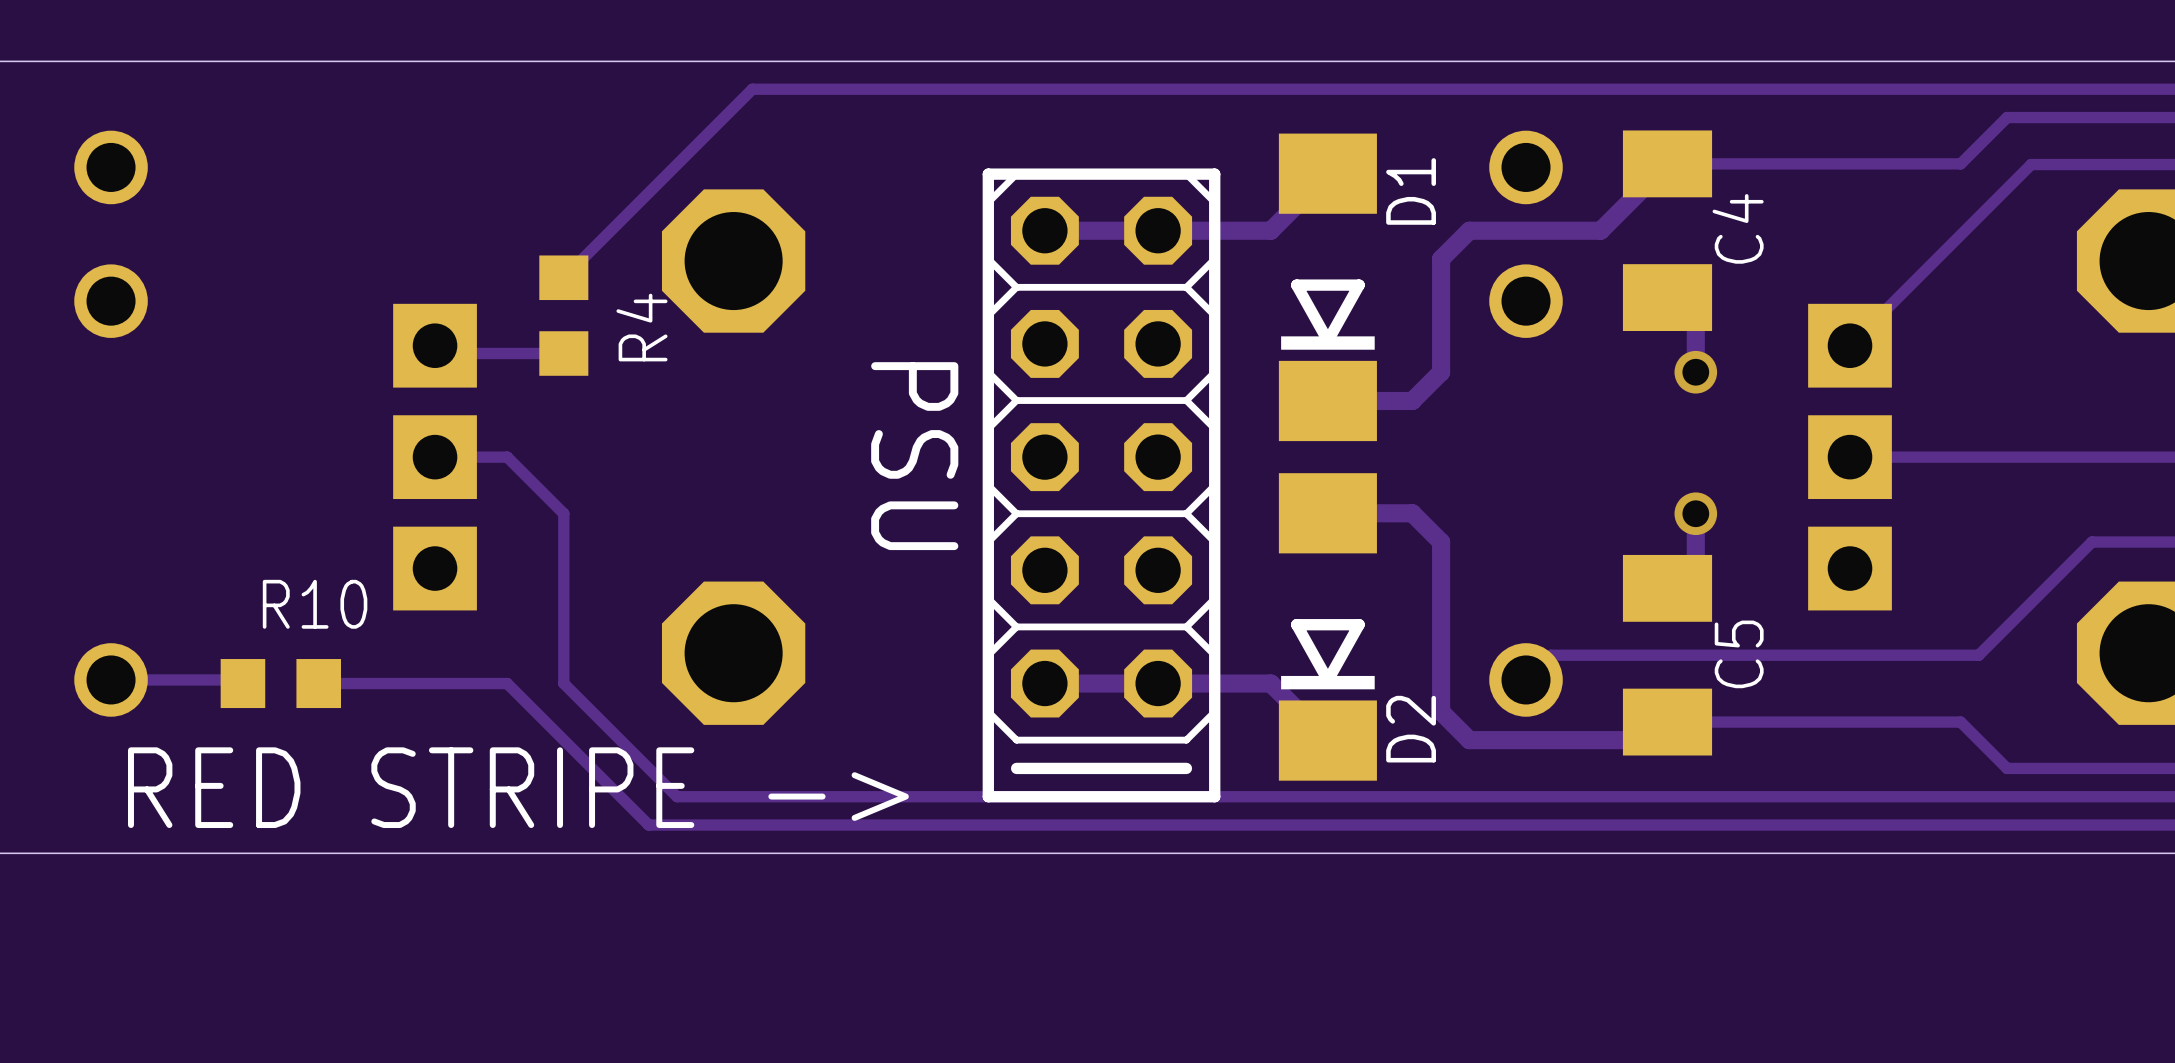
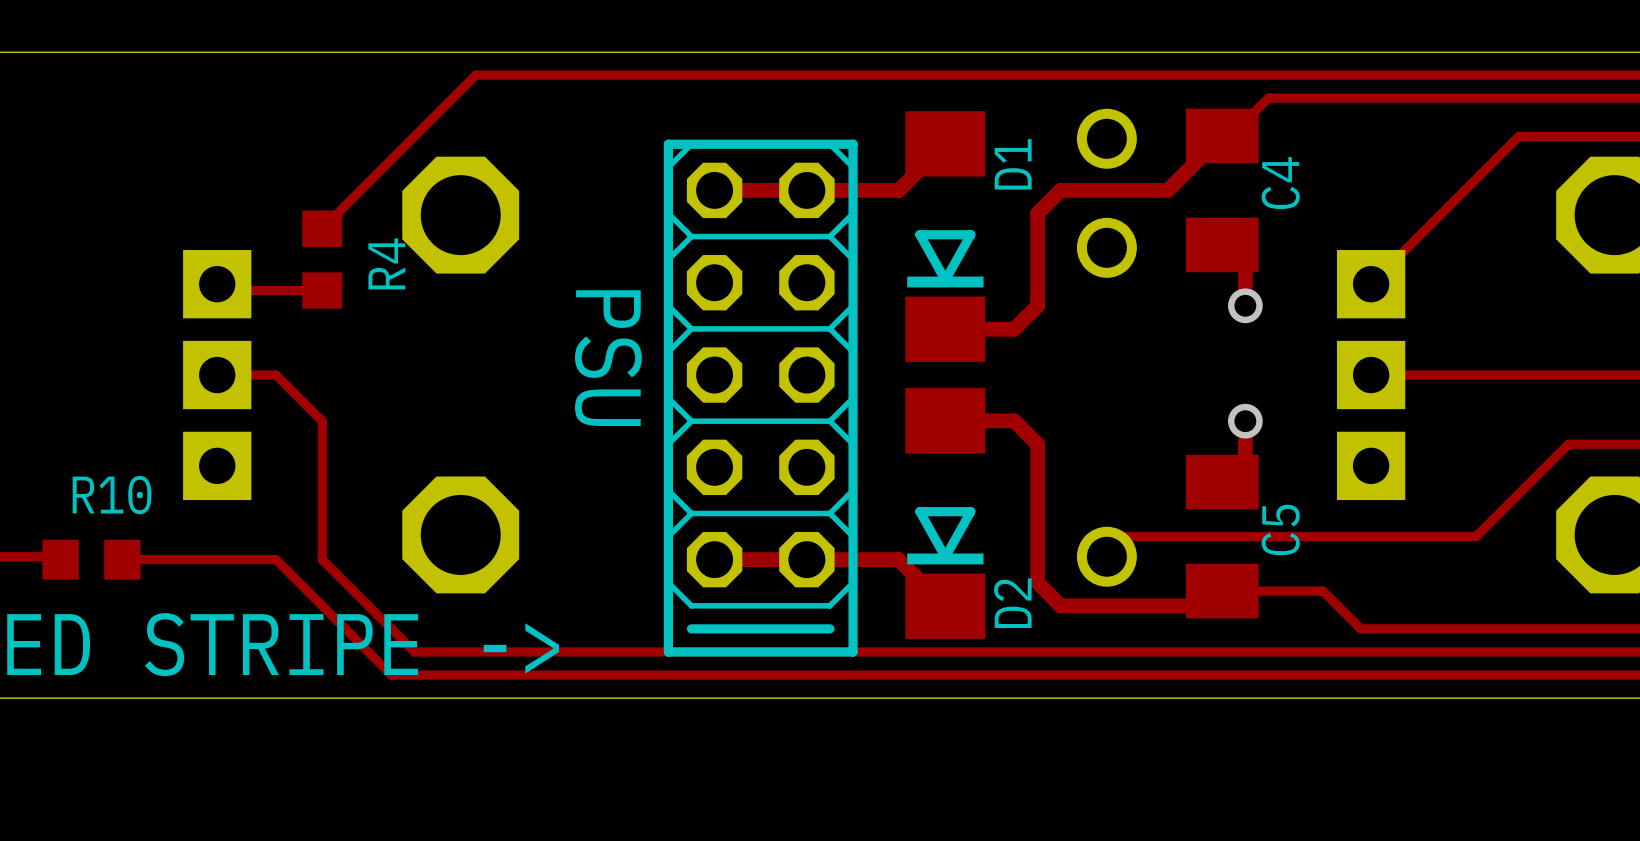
track: (2007, 117) (1960, 163) (1677, 163) -> (1499, 98) (1268, 98) (1230, 135)
track: (1790, 722) (1960, 722) (2007, 768) -> (1322, 591) (1360, 628) (1499, 628)

